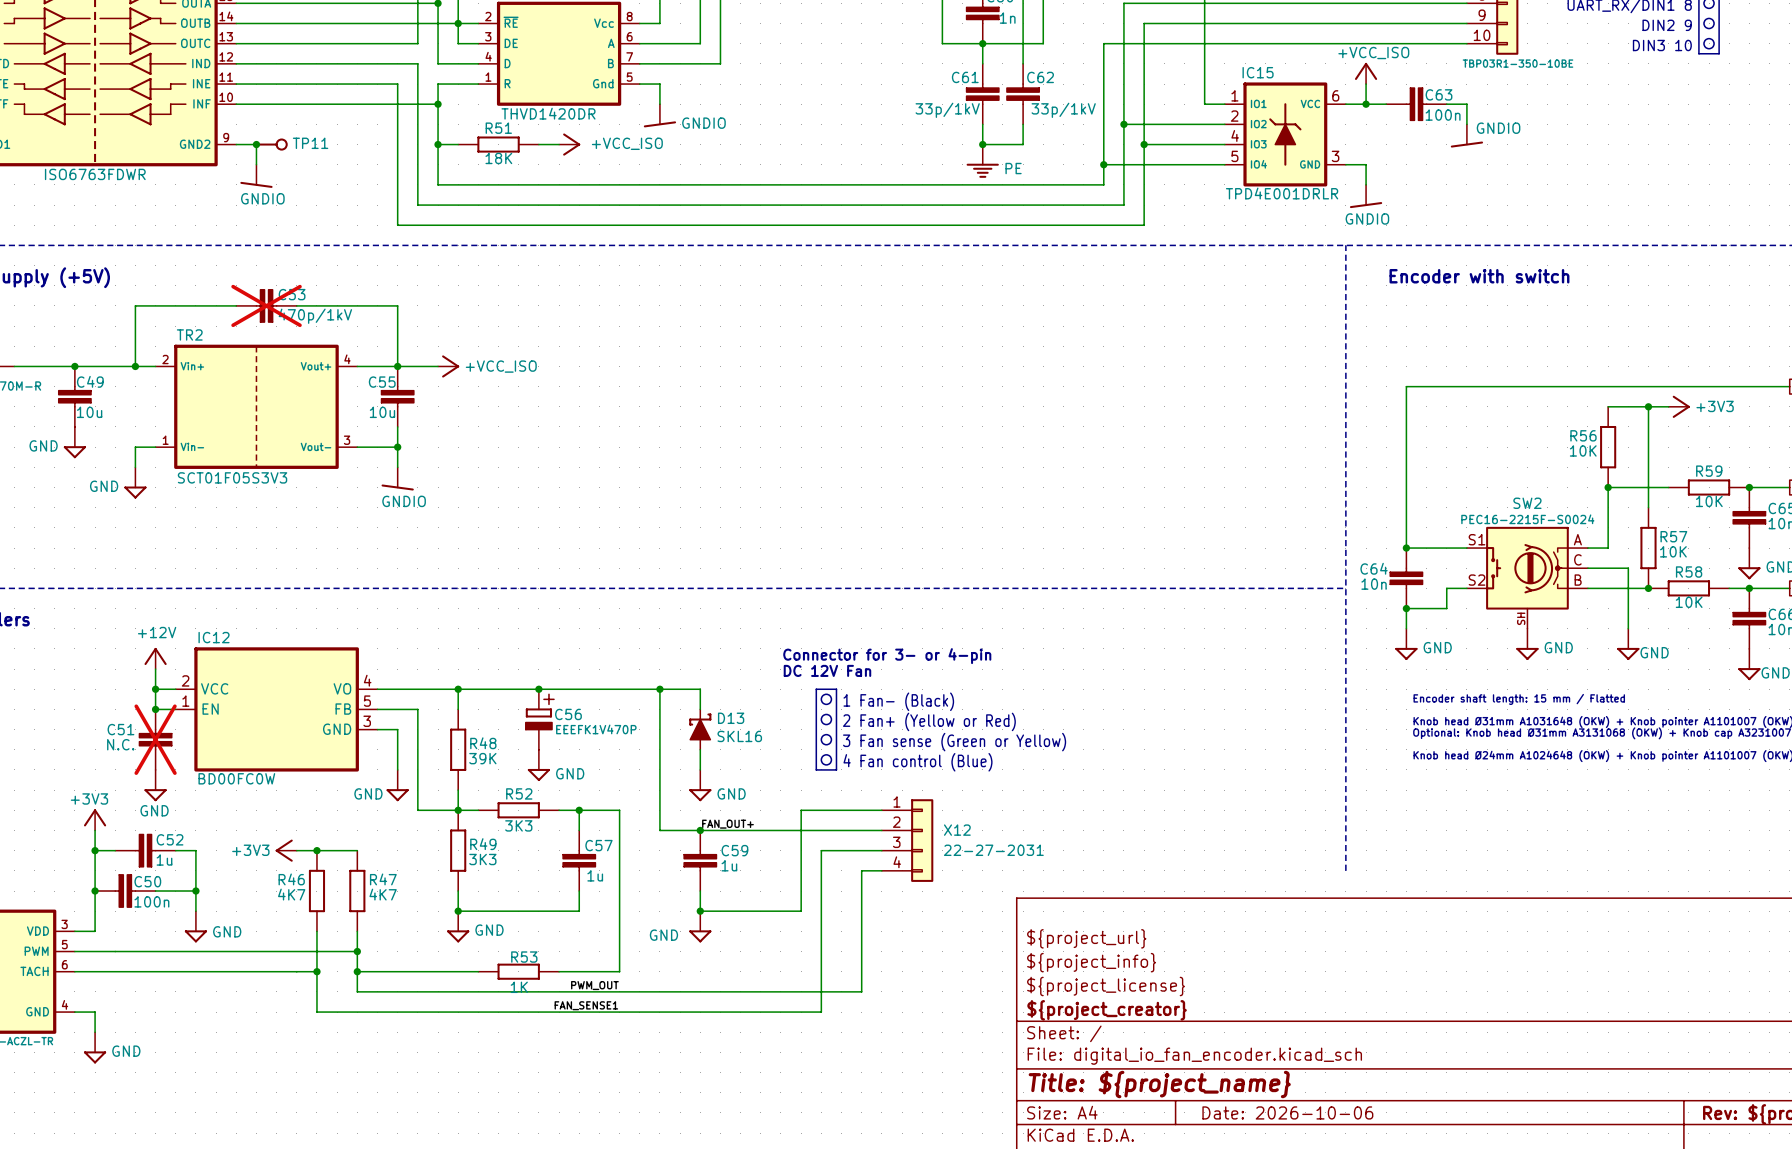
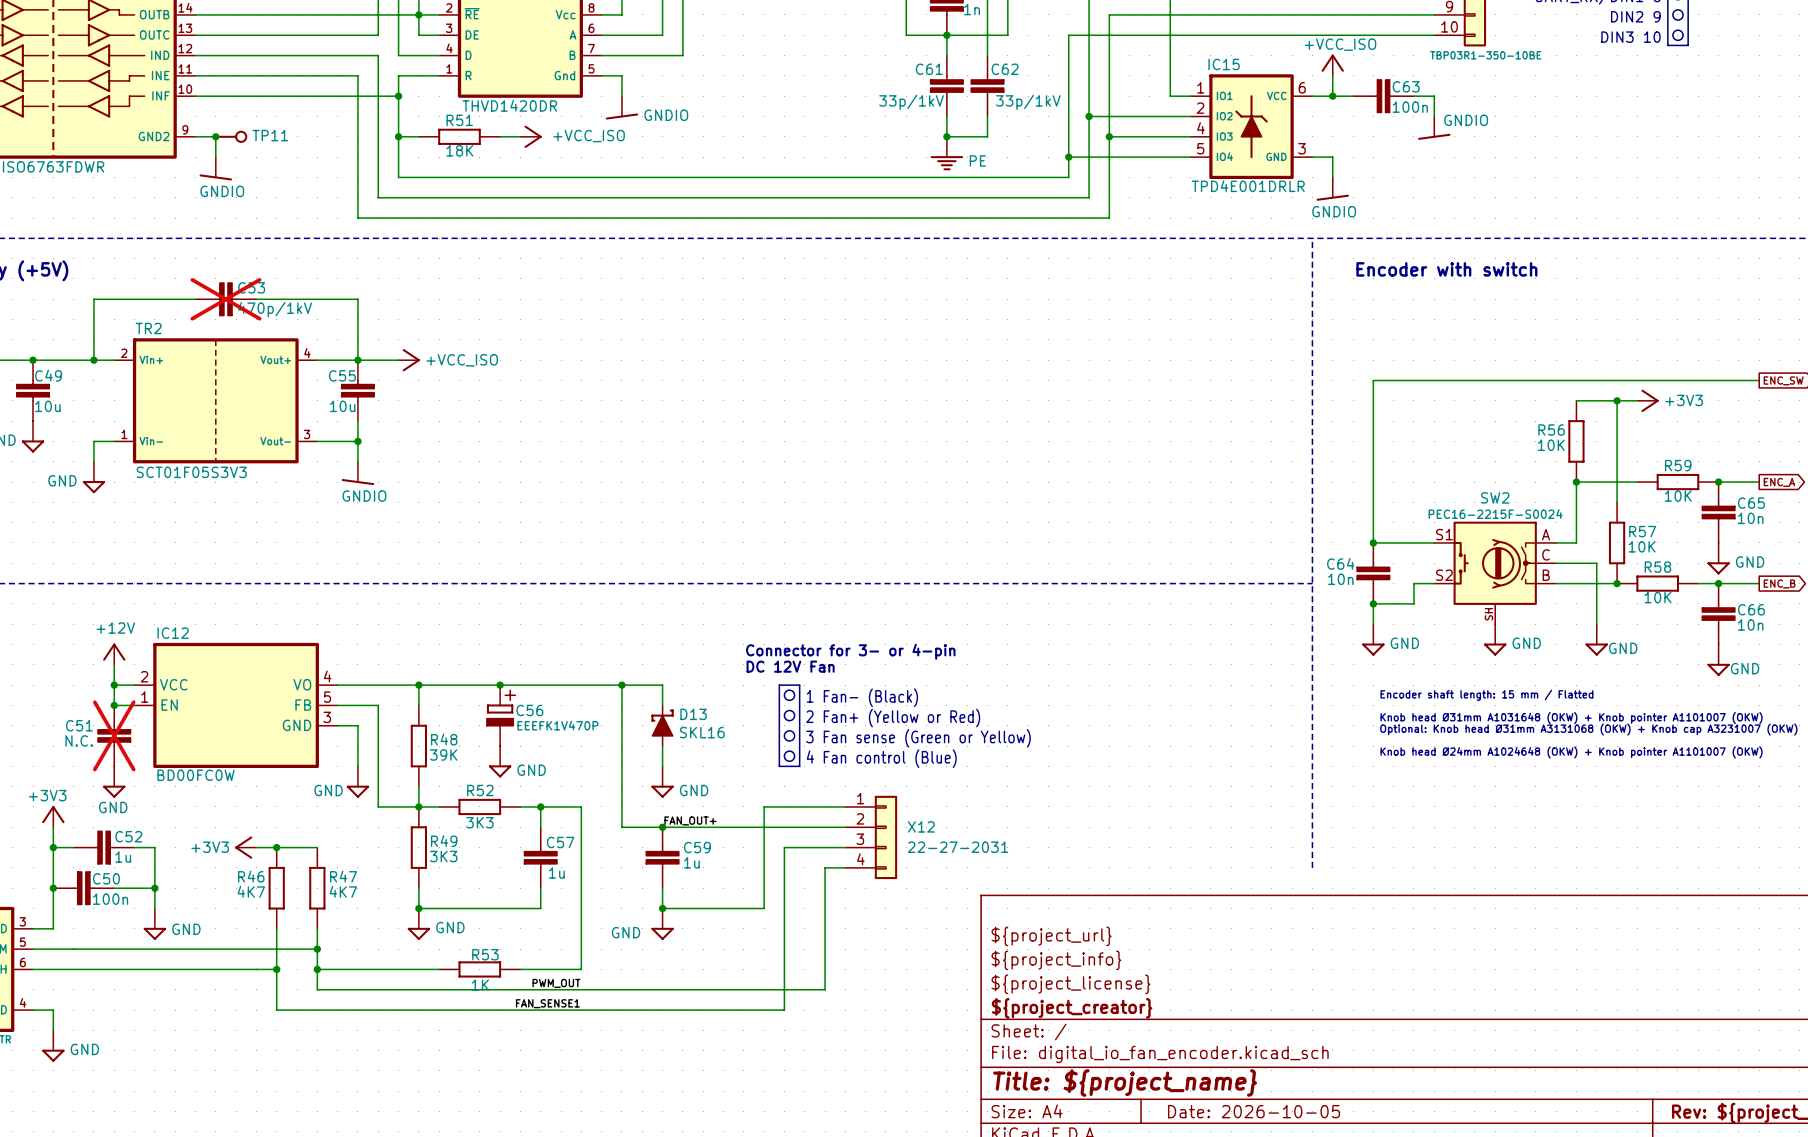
title block: Date: 2026-10-06 (1287, 1112) -> Date: 2026-10-05 (1254, 1111)

